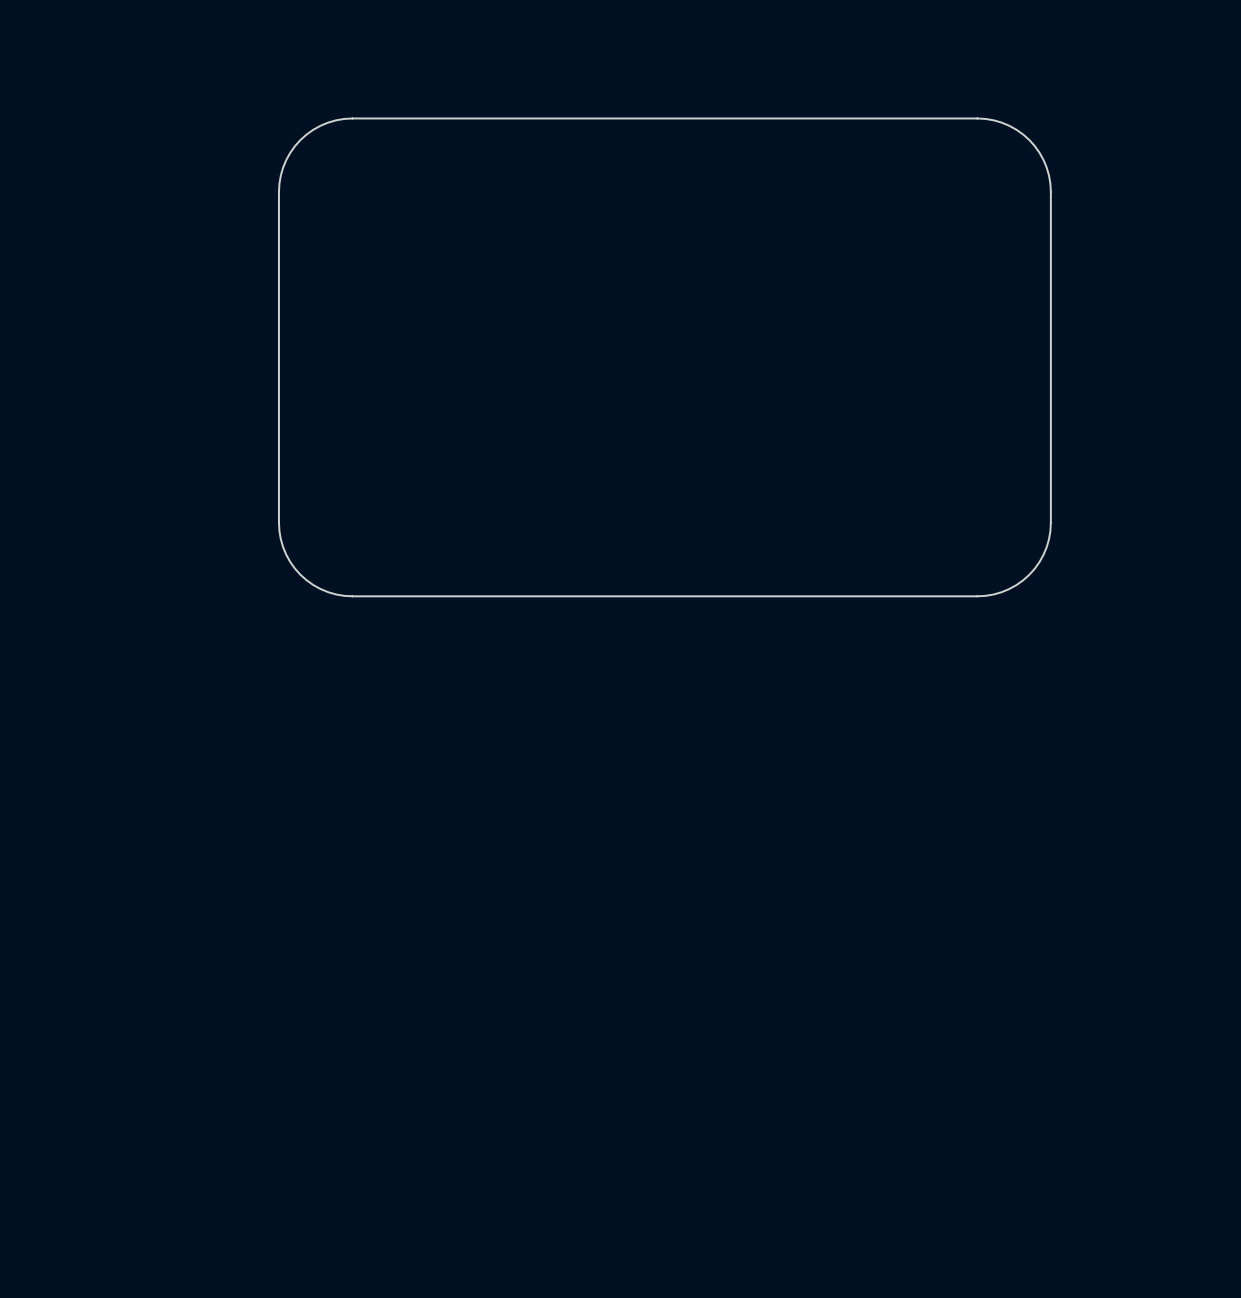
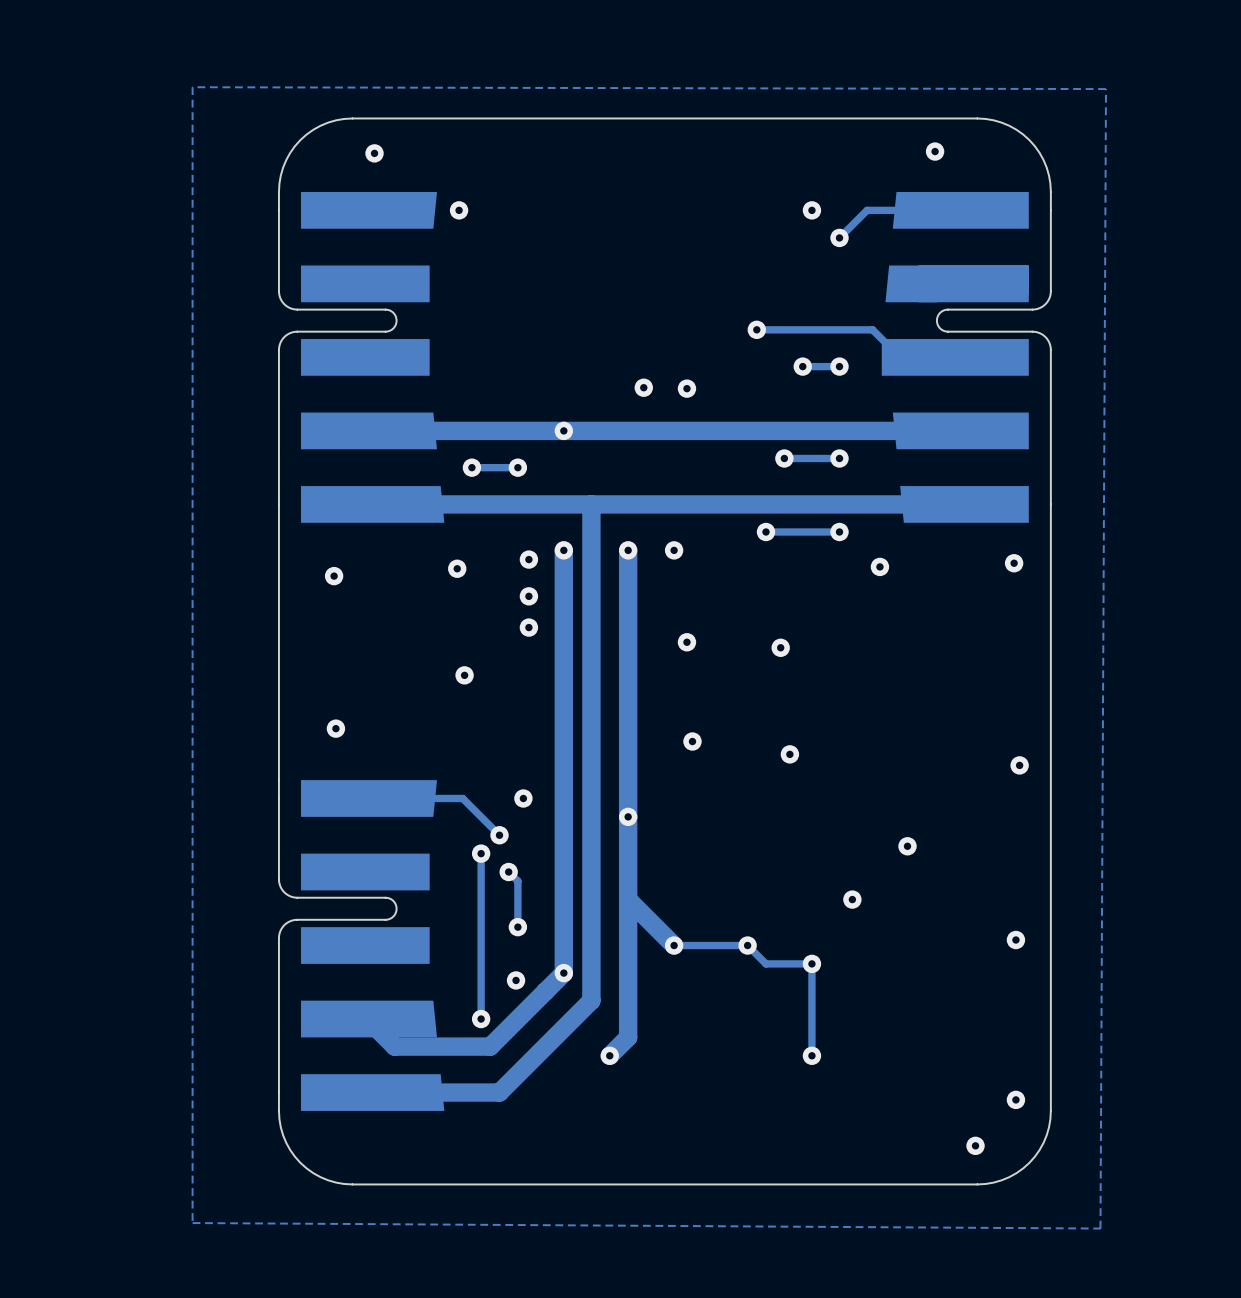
zone outline: none -> (192, 87) (1106, 89) (1100, 1228) (192, 1223) (192, 87)
via: none -> (935, 151)
via: none -> (374, 153)
board edge: (278, 210) (278, 504) -> none
via: none -> (459, 210)
via: none -> (811, 210)
track: none -> (962, 210) (867, 210) (839, 237)
board edge: (1050, 210) (1050, 504) -> none
via: none -> (839, 237)
track: none -> (756, 329) (872, 329) (900, 357) (955, 357)
via: none -> (756, 329)
part: none -> (361, 357)
part: none -> (966, 357)
via: none -> (802, 366)
track: none -> (839, 366) (802, 366)
via: none -> (839, 366)
via: none -> (643, 387)
via: none -> (686, 388)
via: none -> (563, 430)
track: none -> (962, 430) (367, 430)
via: none -> (784, 458)
track: none -> (839, 458) (784, 458)
via: none -> (839, 458)
via: none -> (471, 467)
track: none -> (517, 467) (471, 467)
via: none -> (517, 467)
track: none -> (591, 504) (591, 1000) (499, 1092) (370, 1092)
track: none -> (966, 504) (370, 504)
board edge: none -> (278, 522) (278, 798)
board edge: (1050, 522) (1049, 539) (1043, 554) (1029, 574) (1016, 585) (1001, 592) (977, 596) (344, 595) (320, 589) (306, 580) (295, 568) (283, 547) (278, 522) -> (1050, 522) (1050, 1110) (1049, 1127) (1043, 1142) (1034, 1156) (1023, 1168) (1001, 1180) (977, 1184) (344, 1183) (320, 1177) (306, 1168) (295, 1156) (286, 1142) (280, 1127) (278, 1092)
via: none -> (766, 532)
track: none -> (839, 532) (766, 532)
via: none -> (839, 532)
track: none -> (563, 550) (563, 973) (490, 1046) (394, 1046) (367, 1019)
via: none -> (563, 550)
track: none -> (628, 550) (628, 1037) (609, 1055)
via: none -> (628, 550)
via: none -> (674, 550)
via: none -> (528, 559)
via: none -> (1014, 563)
via: none -> (879, 566)
via: none -> (457, 568)
via: none -> (334, 576)
via: none -> (528, 596)
via: none -> (528, 627)
via: none -> (686, 642)
via: none -> (780, 647)
via: none -> (464, 675)
via: none -> (335, 728)
via: none -> (692, 741)
via: none -> (789, 754)
via: none -> (1019, 765)
track: none -> (367, 798) (462, 798) (499, 835)
via: none -> (523, 798)
via: none -> (628, 816)
via: none -> (499, 835)
via: none -> (907, 846)
track: none -> (481, 853) (481, 1019)
via: none -> (481, 853)
track: none -> (508, 872) (517, 881) (517, 927)
via: none -> (508, 872)
track: none -> (628, 899) (674, 945) (747, 945) (766, 963) (811, 963) (811, 1055)
via: none -> (852, 899)
via: none -> (517, 927)
via: none -> (1015, 940)
part: none -> (361, 945)
via: none -> (674, 945)
via: none -> (747, 945)
via: none -> (811, 963)
via: none -> (563, 973)
via: none -> (516, 980)
via: none -> (481, 1019)
via: none -> (609, 1055)
via: none -> (811, 1055)
via: none -> (1015, 1099)
via: none -> (975, 1145)

